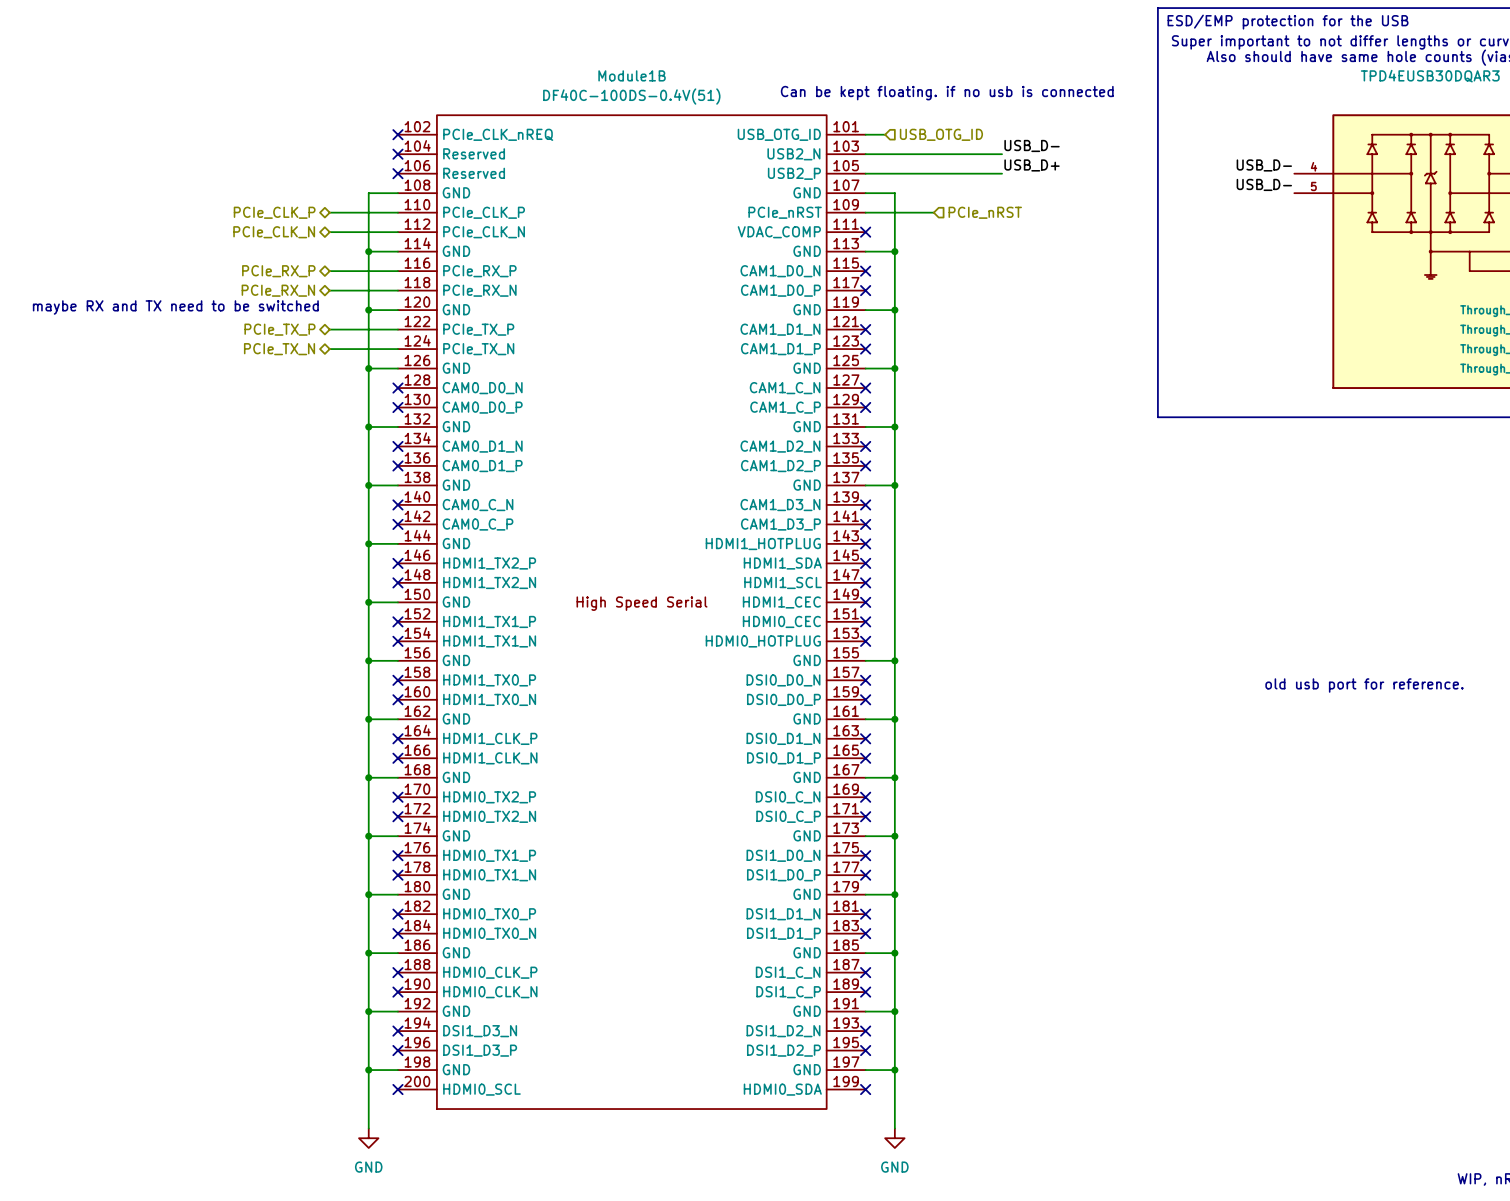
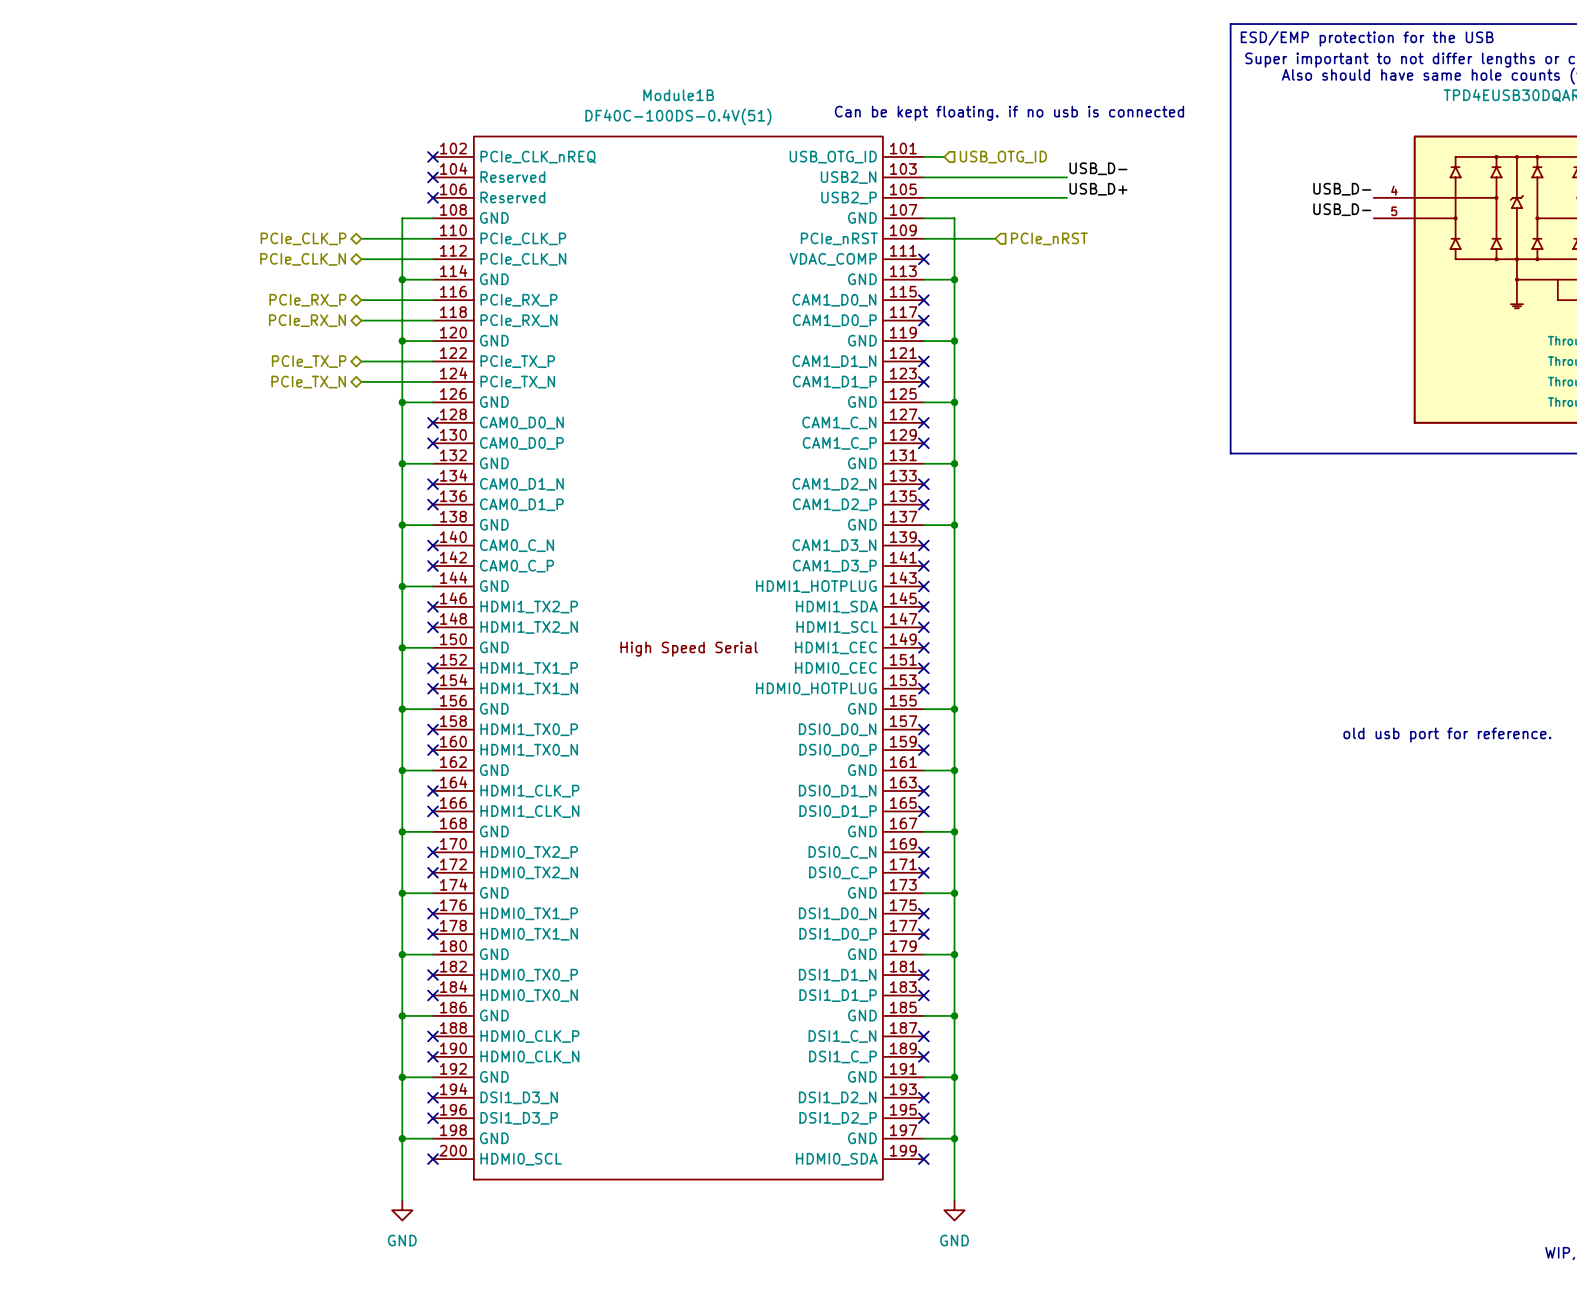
text: maybe RX and TX need to be switched (175, 307) -> none

